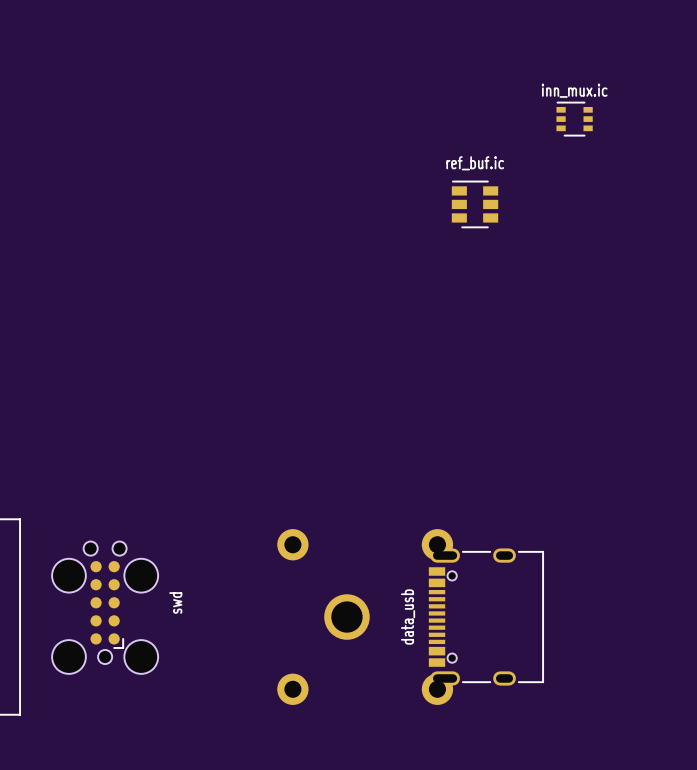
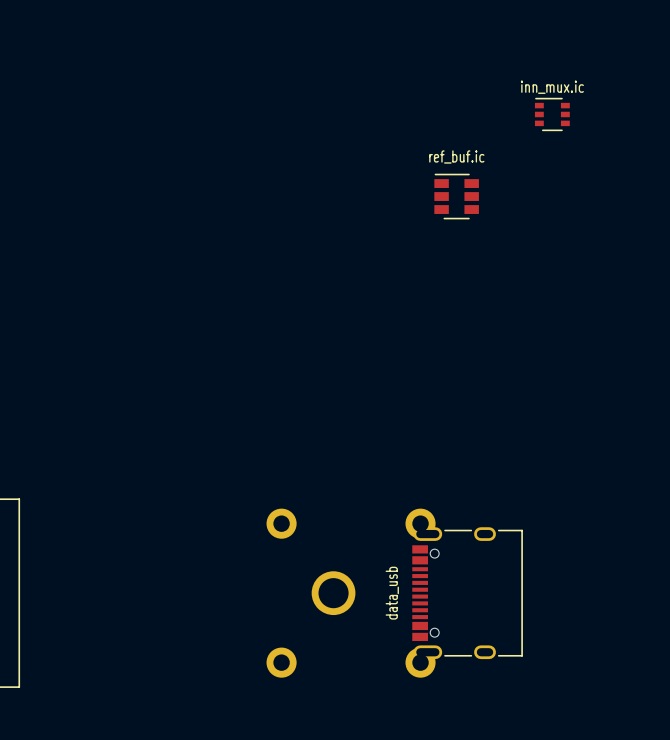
swd: (105, 607) -> none

